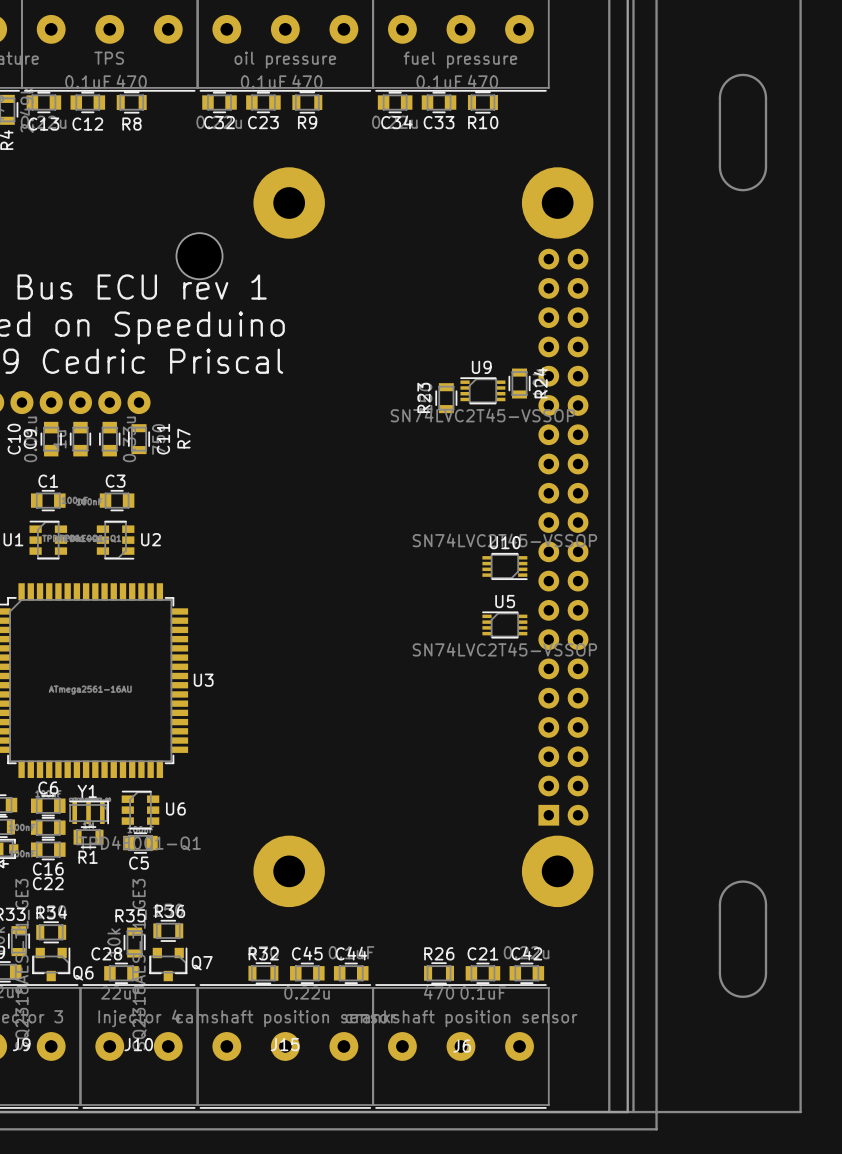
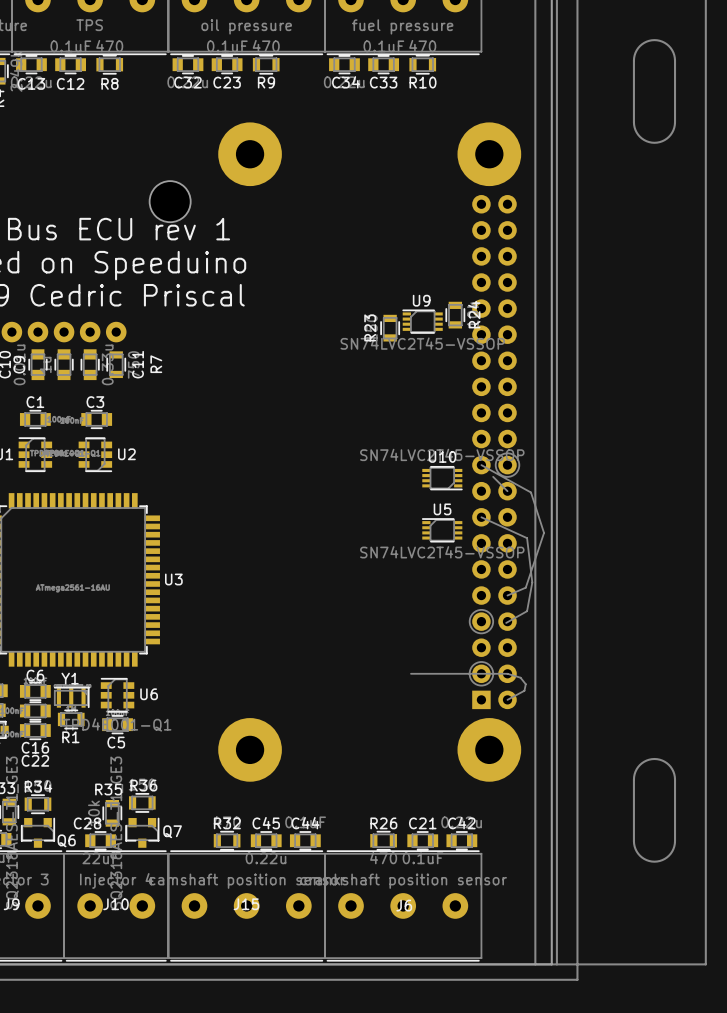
drawing: none -> [494, 452, 521, 478]
line: none -> (481, 465) (530, 492) (544, 532) (525, 587) (507, 595)
line: none -> (493, 476) (507, 491)
line: none -> (481, 517) (527, 538) (532, 582) (527, 611) (506, 622)
drawing: none -> [468, 609, 494, 635]
drawing: none -> [468, 661, 495, 687]
line: none -> (411, 673) (507, 673) (520, 677) (525, 684) (524, 690) (507, 699)

